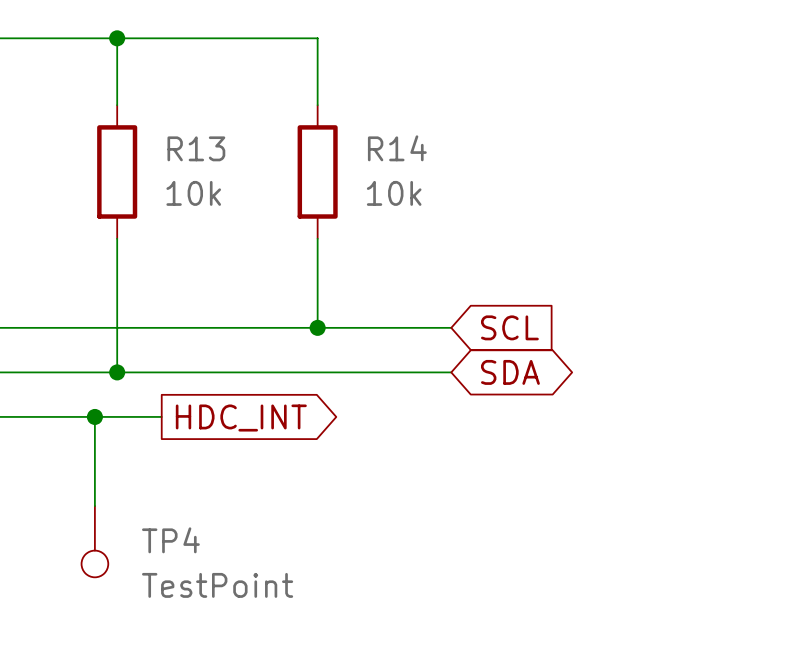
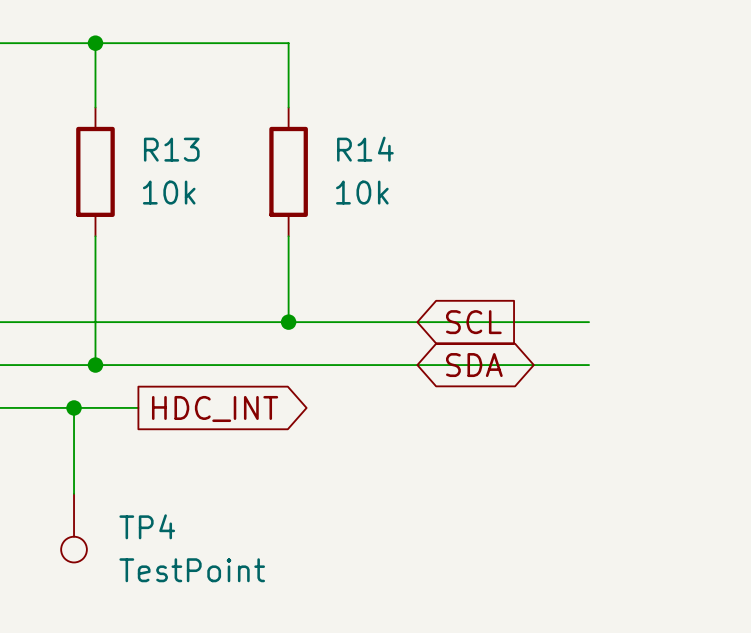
wire: none -> (417, 322) (589, 322)
wire: none -> (417, 365) (589, 365)

